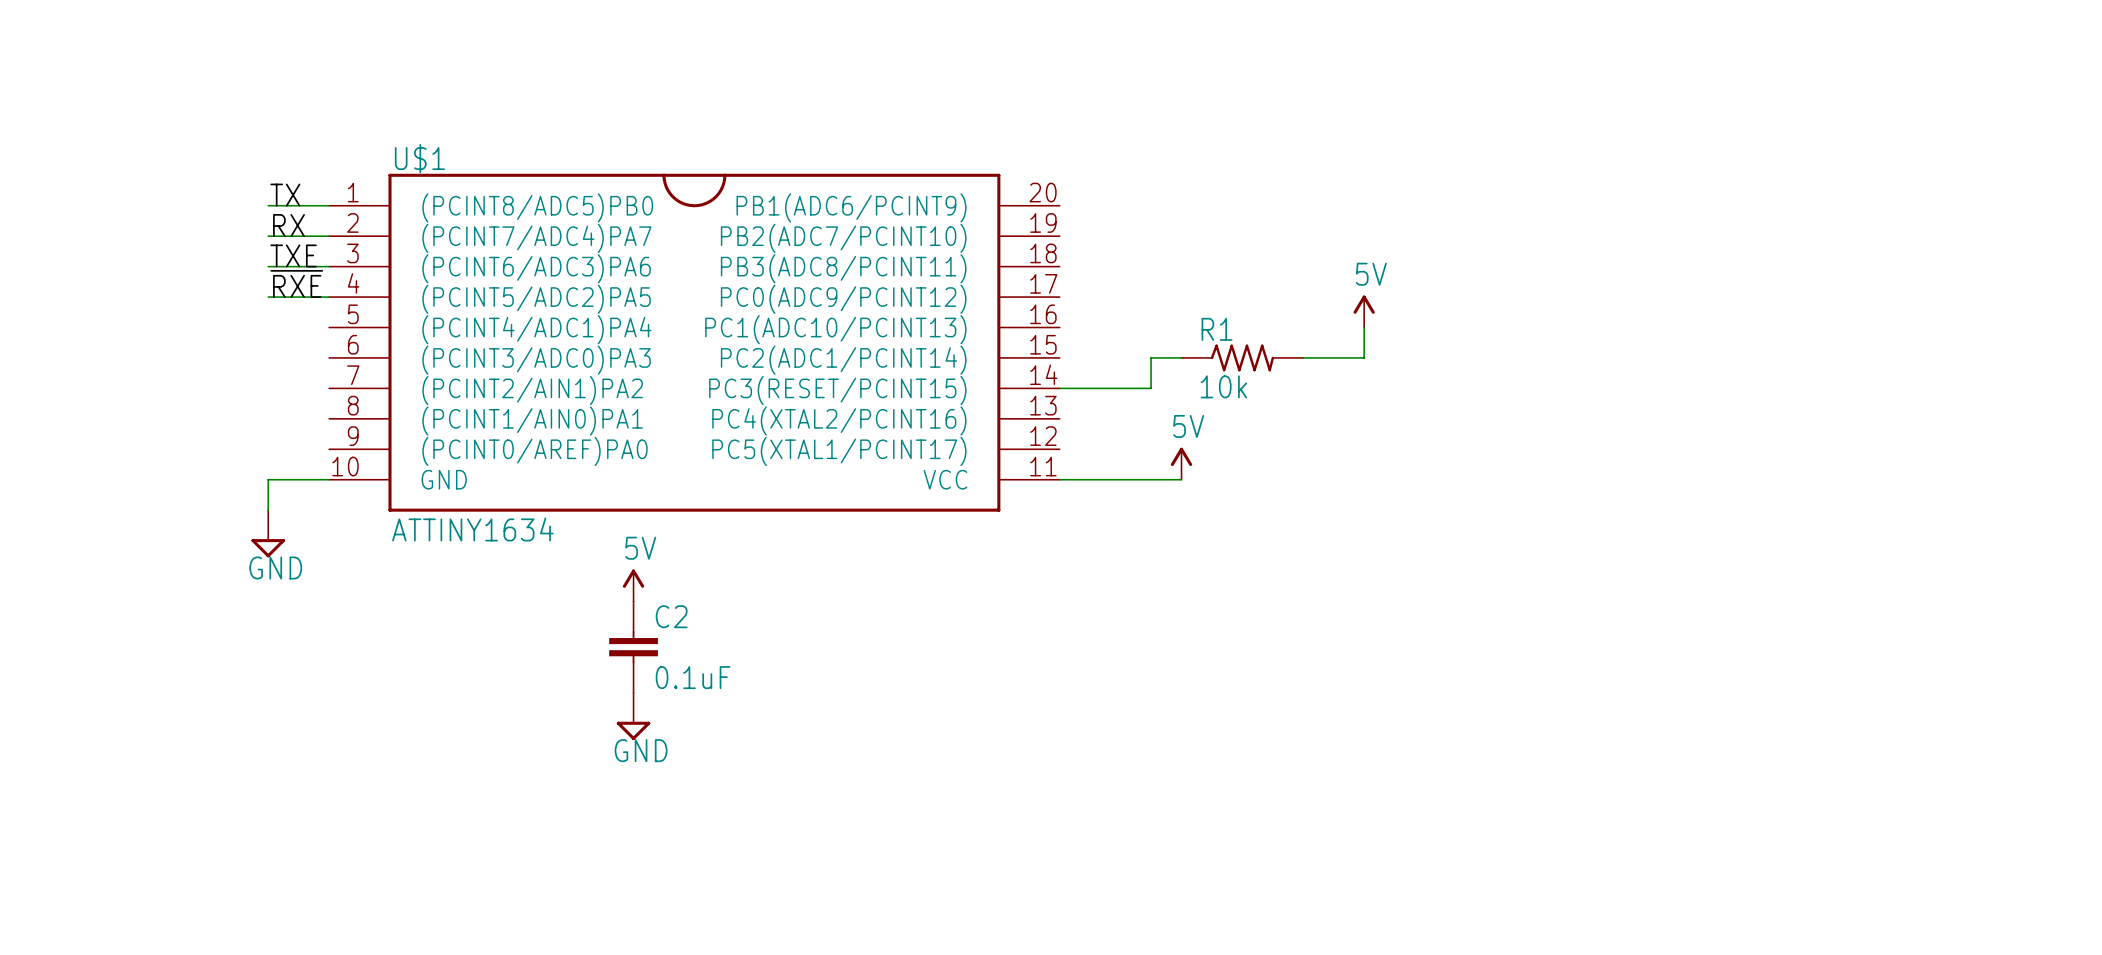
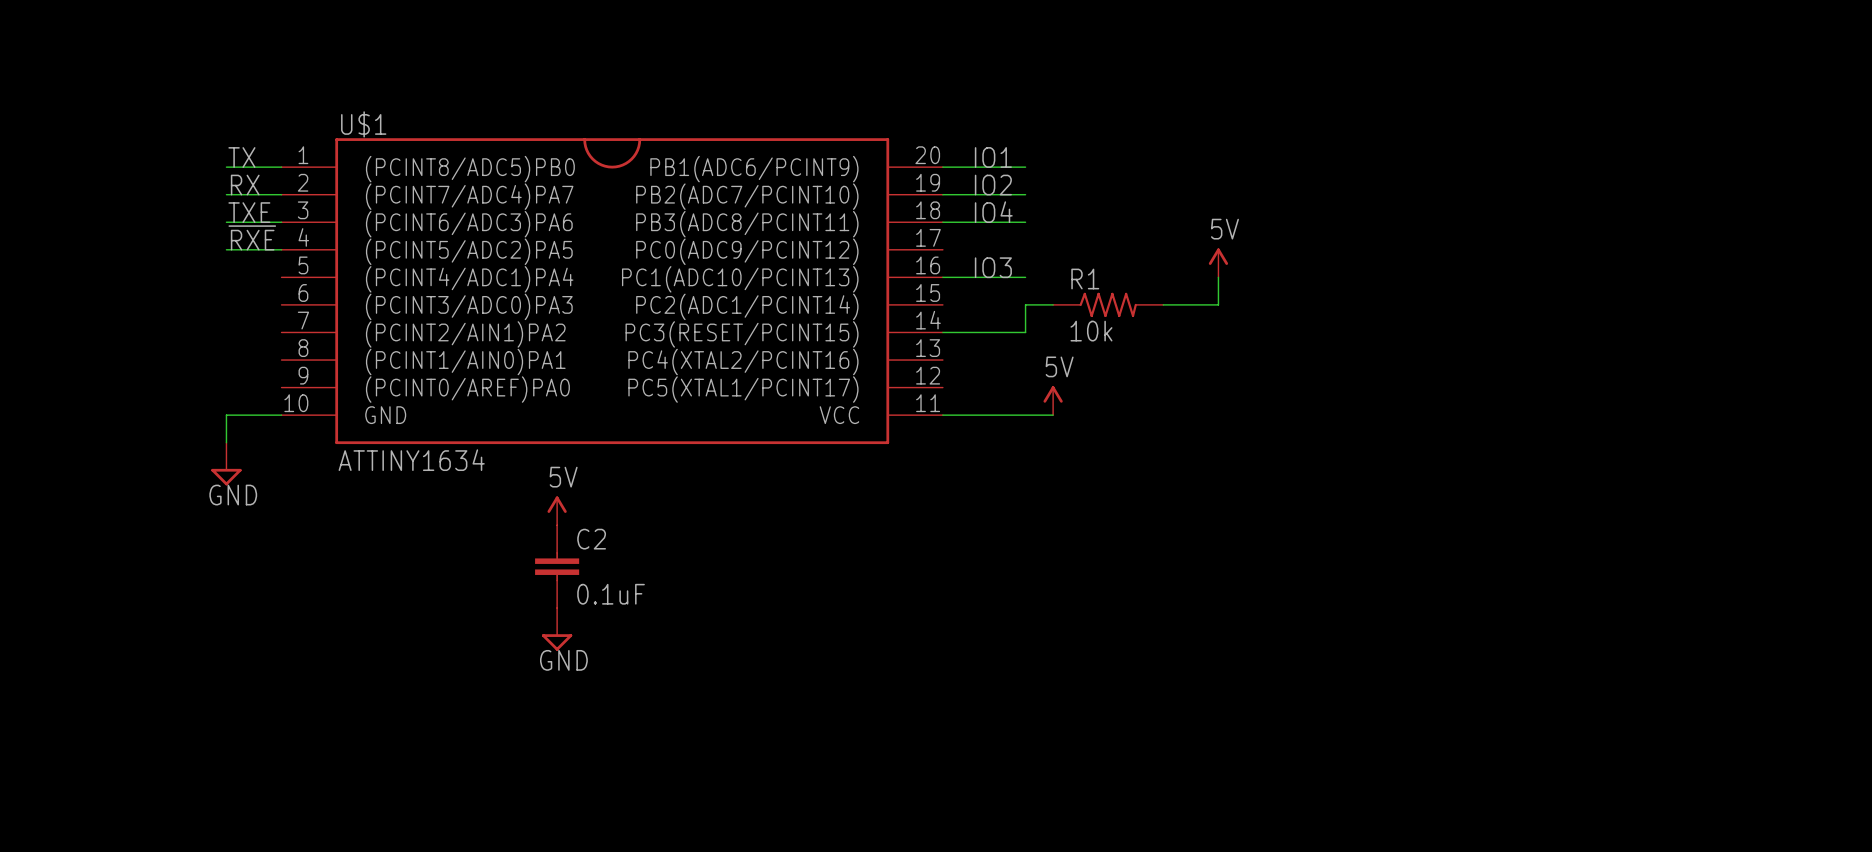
label: none -> IO1 (993, 157)
wire: none -> (942, 167) (1025, 167)
label: none -> IO2 (993, 185)
wire: none -> (942, 194) (1025, 194)
label: none -> IO4 (993, 212)
wire: none -> (942, 222) (1025, 222)
label: none -> IO3 (993, 267)
wire: none -> (942, 277) (1025, 277)

